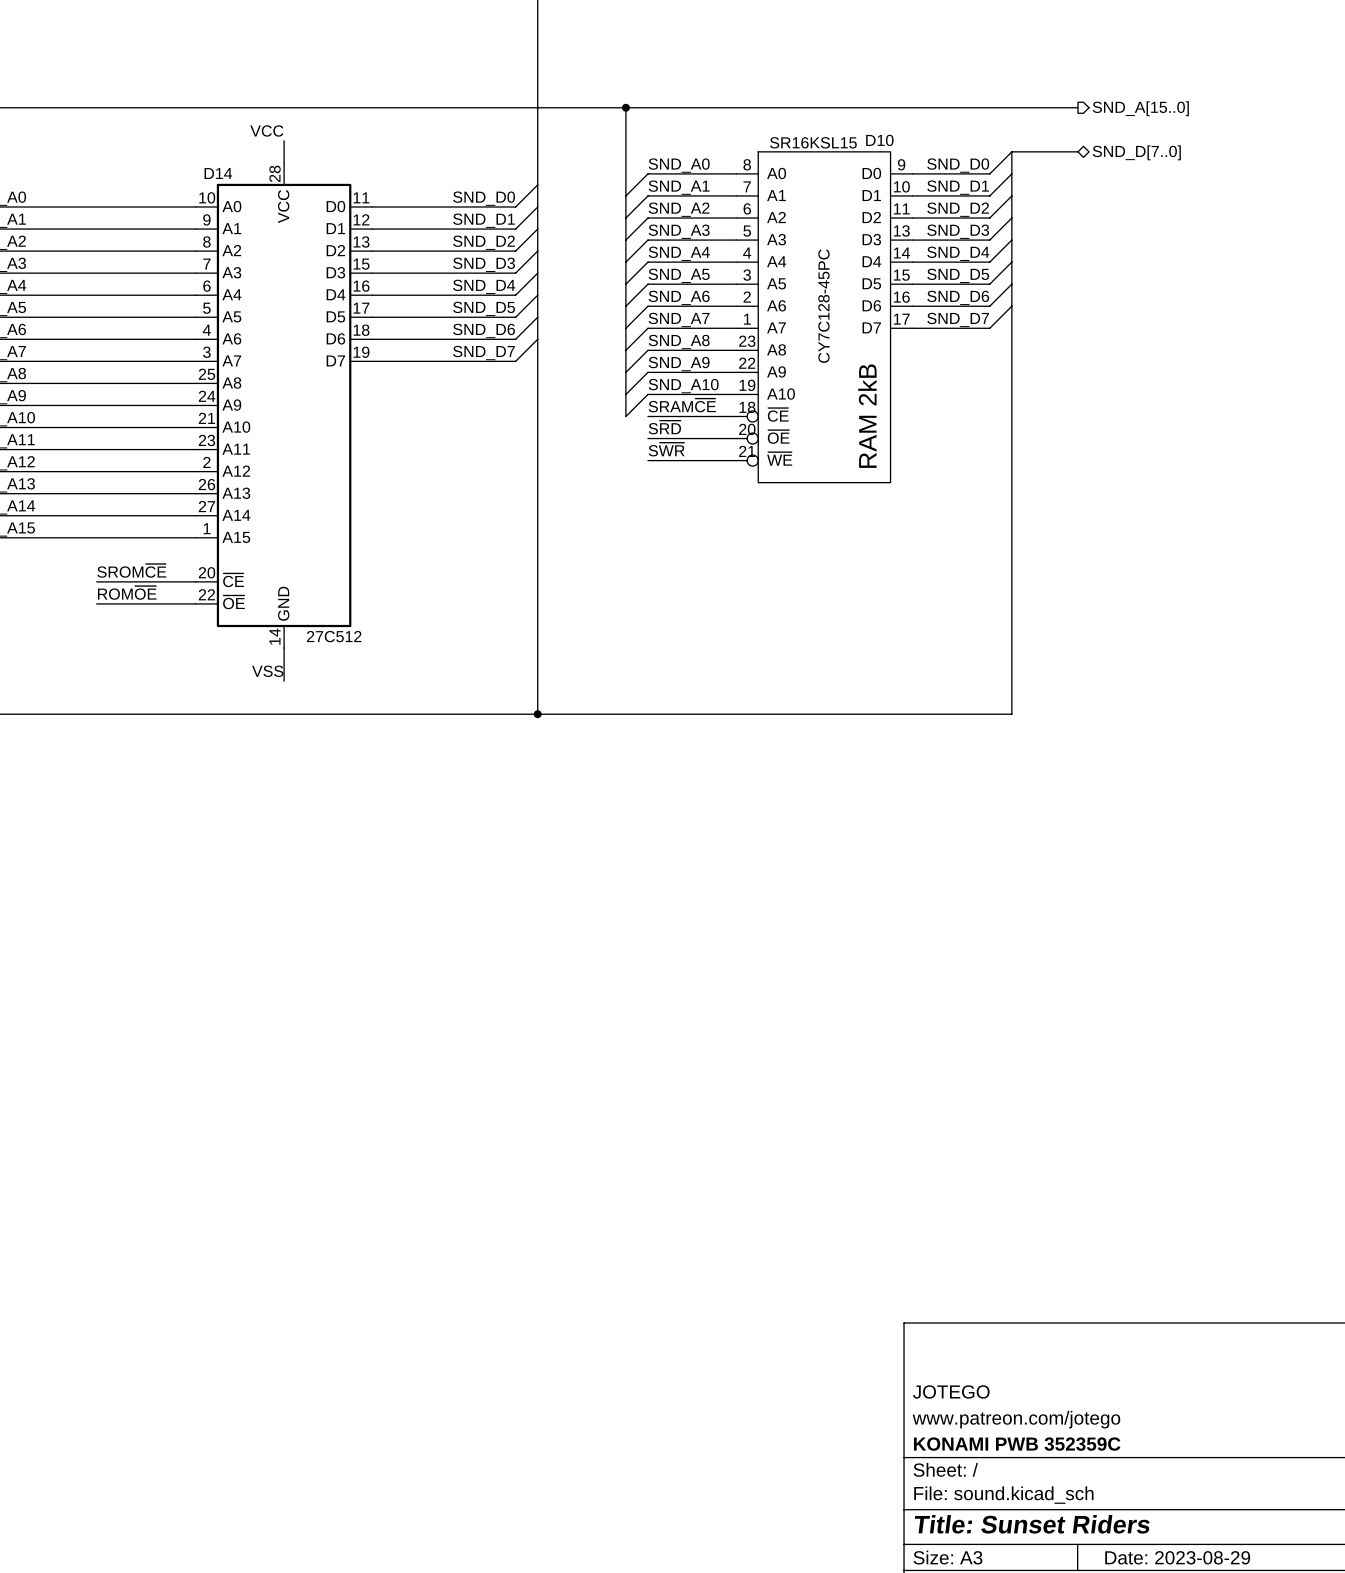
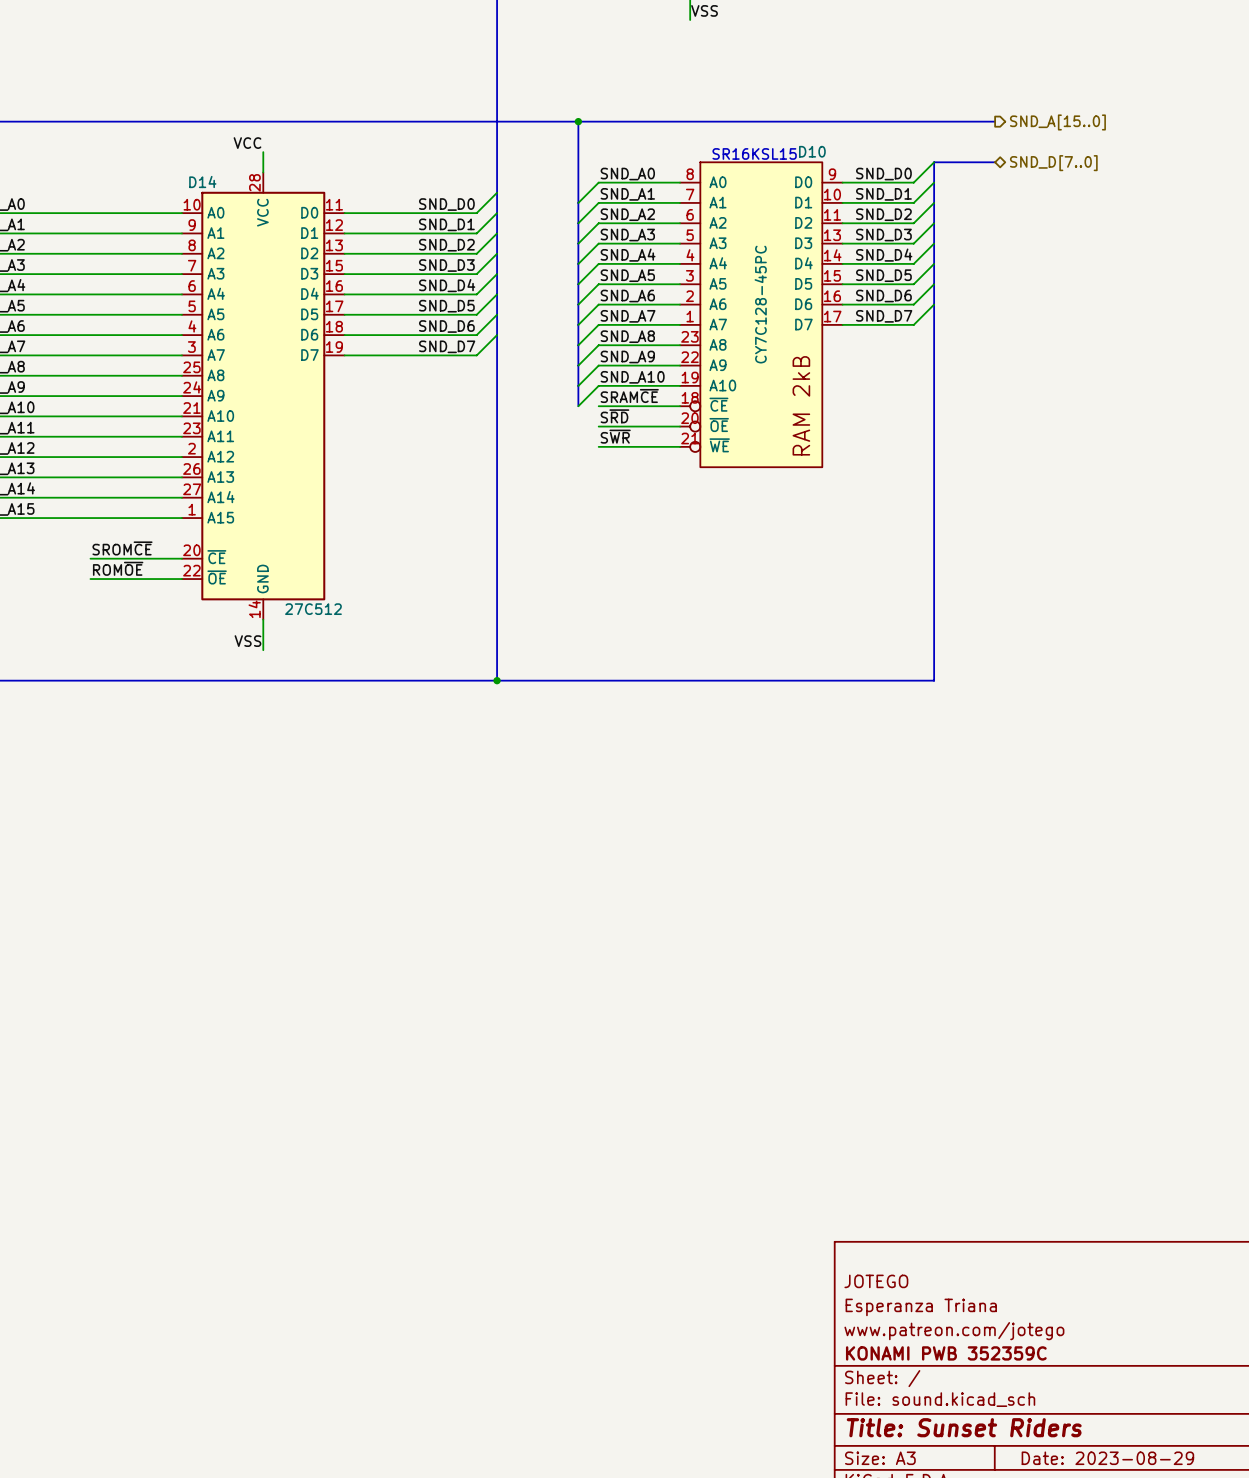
title block: none -> JOTEGO (876, 1281)
title block: JOTEGO (951, 1391) -> Esperanza Triana (921, 1307)

